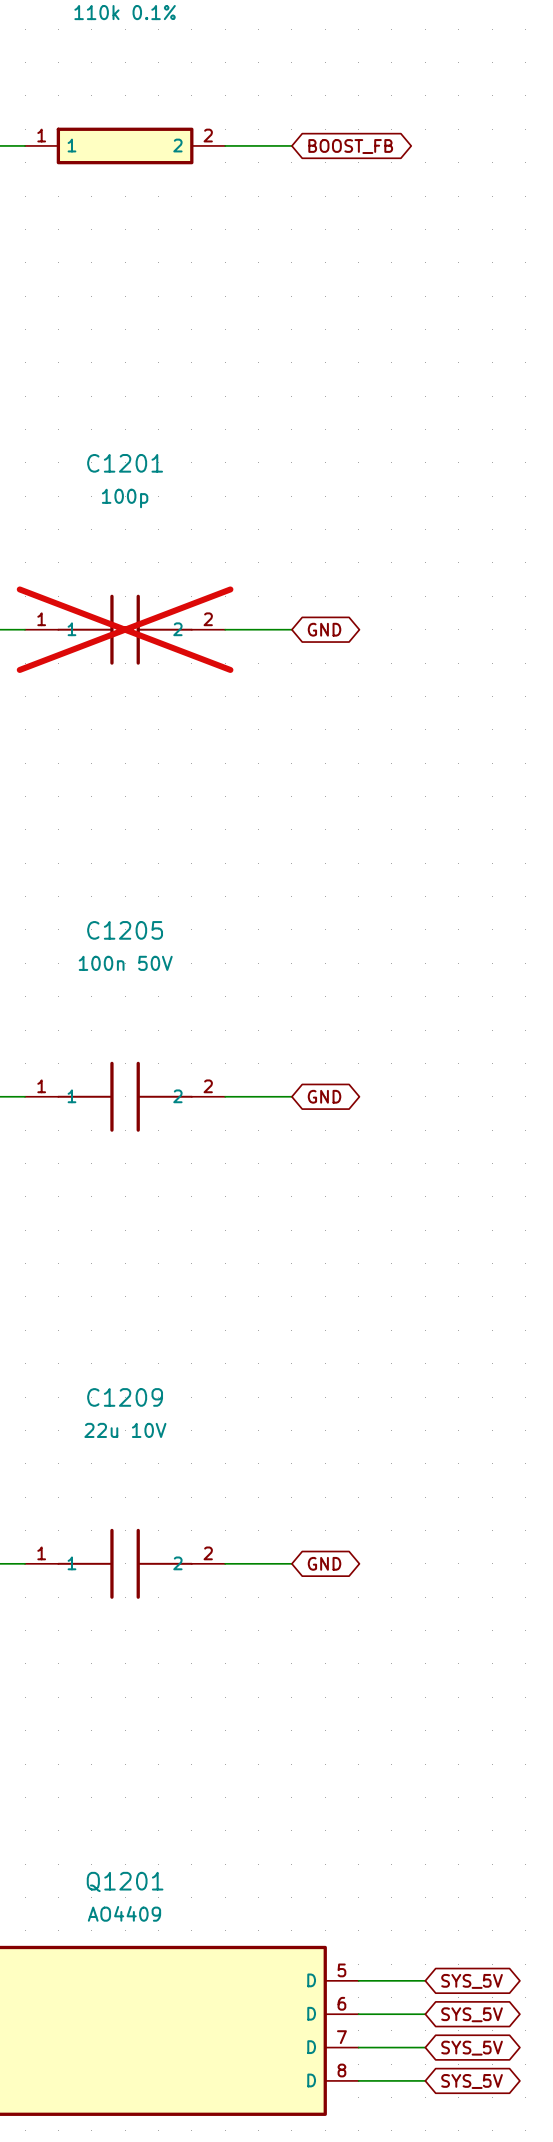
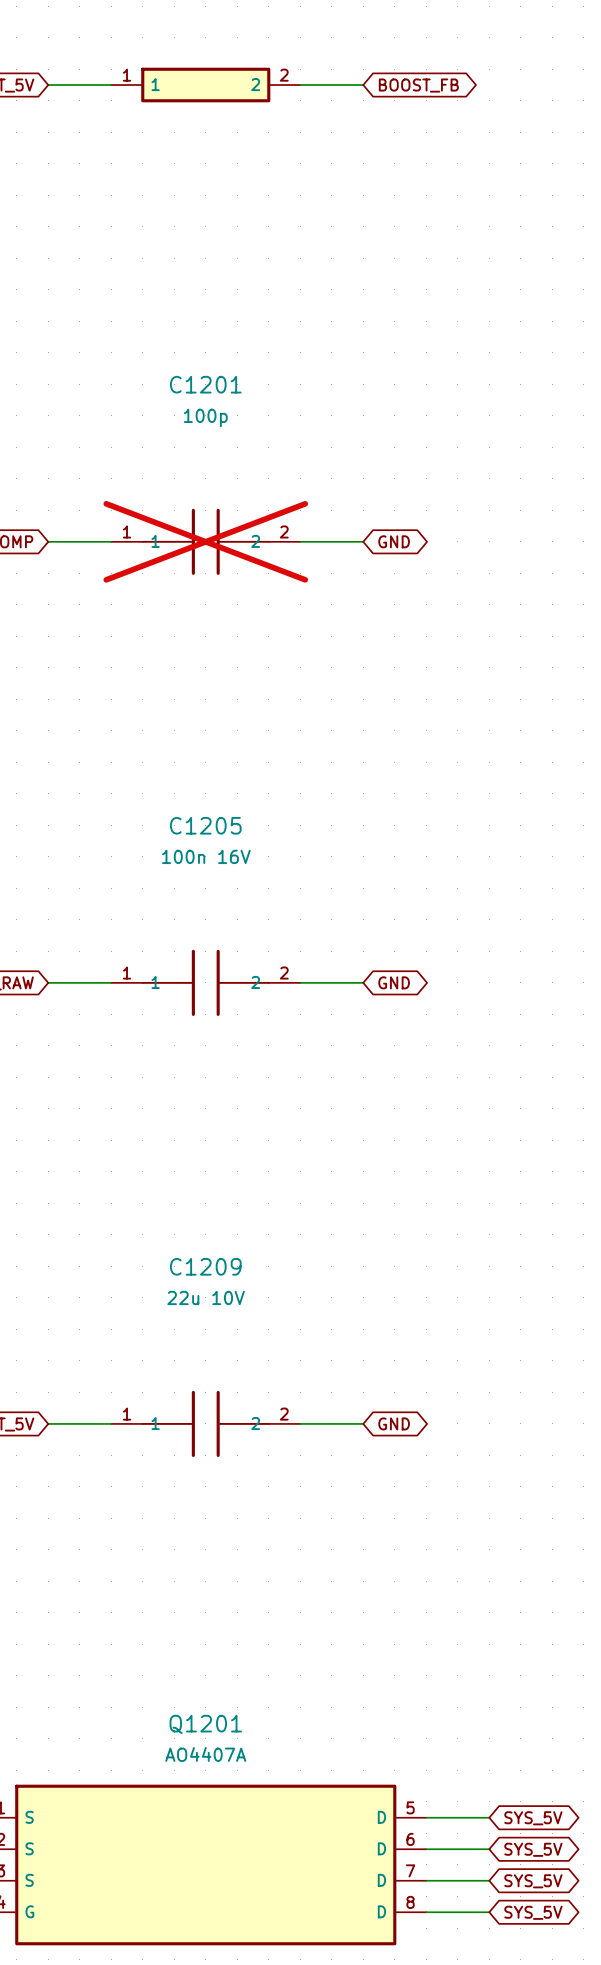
C1205 value: 100n 50V (125, 963) -> 100n 16V (206, 856)
Q1201 value: AO4409 (124, 1913) -> AO4407A (205, 1754)

